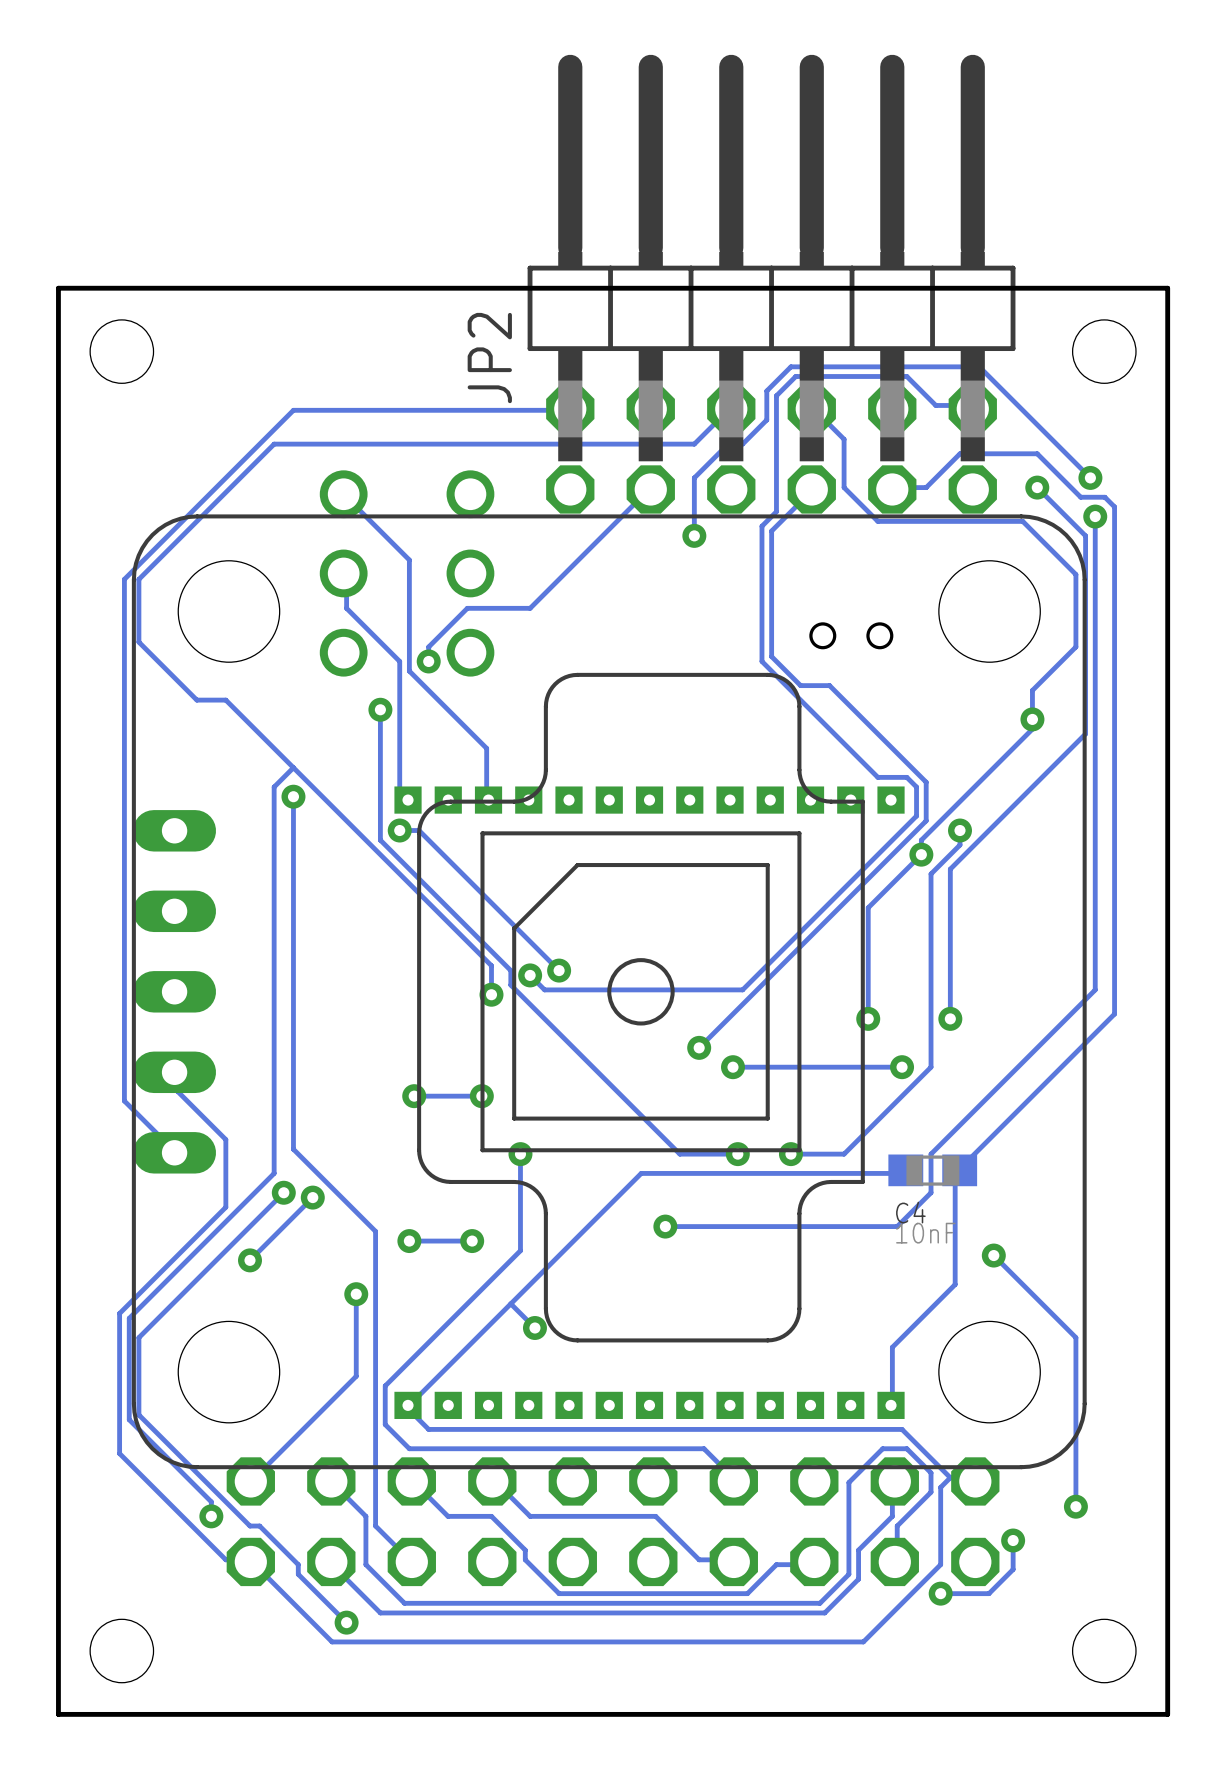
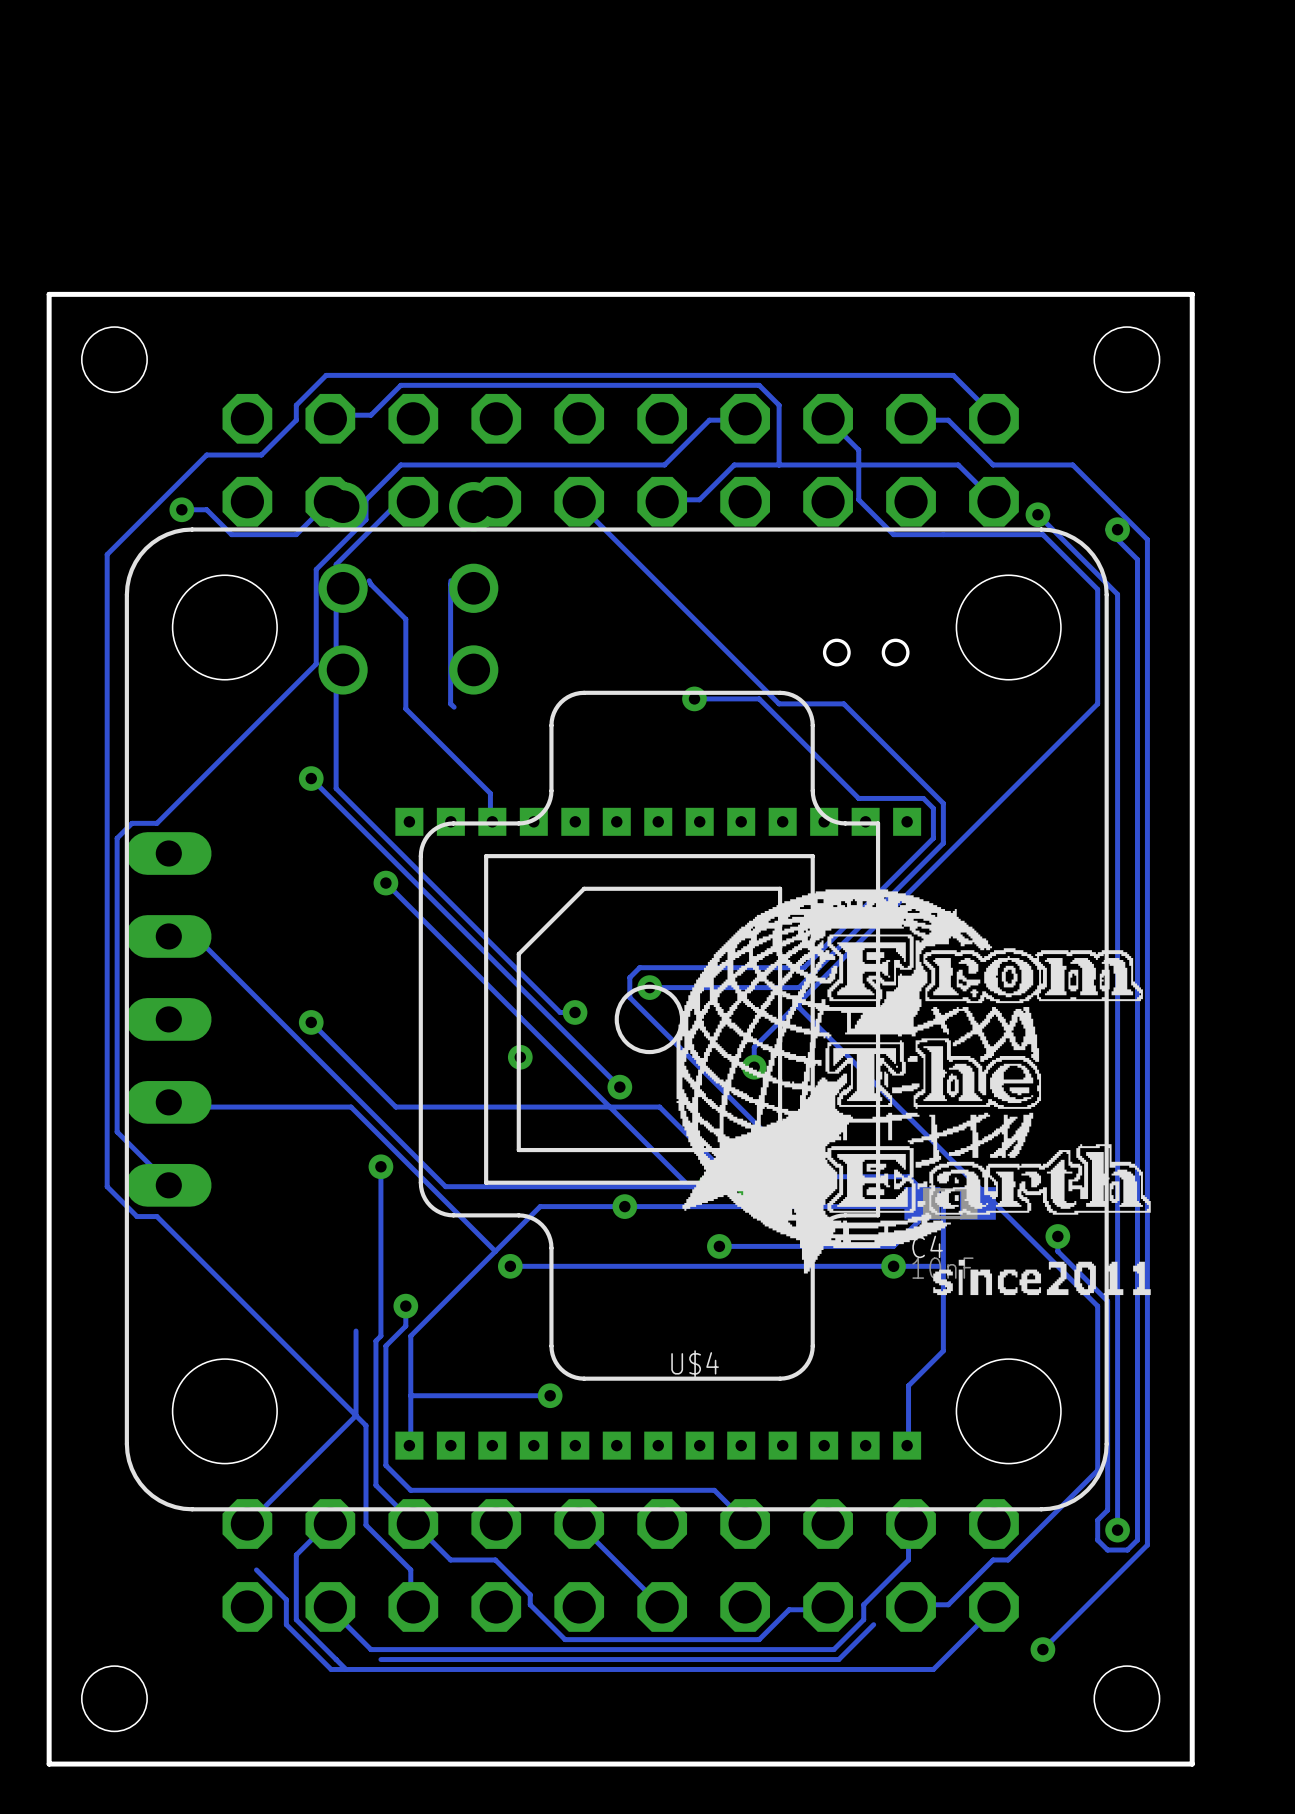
JP2: (771, 284) -> none
track: (790, 366) (766, 390) (766, 395) -> (330, 418) (331, 415) (370, 415) (400, 385) (759, 385) (779, 405)
track: none -> (804, 375) (326, 375) (296, 405) (296, 420) (261, 455) (206, 455) (107, 554) (107, 1186) (137, 1216) (156, 1216) (366, 1425) (366, 1525) (410, 1569) (410, 1604)
track: (935, 366) (979, 366) (1090, 477) -> (953, 375) (993, 415) (993, 418)
track: (570, 408) (293, 410) (124, 579) (124, 816) -> (745, 418) (709, 420) (664, 464) (400, 464) (366, 499) (366, 519) (316, 569) (316, 664) (156, 823) (132, 823) (117, 838)
track: (731, 408) (694, 444) (274, 444) (138, 579) (138, 642) (196, 700) (225, 700) (385, 859) -> none
track: (972, 408) (969, 405) (935, 405) (906, 376) (795, 376) (776, 395) (776, 511) (761, 526) (761, 661) (877, 777) -> (694, 698) (759, 698) (858, 798) (893, 798)
track: (766, 419) (742, 444) (728, 444) (694, 477) (694, 535) -> (779, 430) (779, 464)
part: none -> (620, 460)
track: (974, 453) (960, 453) (926, 487) (892, 487) (892, 489) -> (993, 464) (948, 420) (911, 418)
track: (1037, 453) (1080, 497) (1104, 497) (1114, 506) (1114, 545) -> (1107, 529) (1137, 559)
track: none -> (1057, 464) (1072, 464) (1147, 539) (1147, 1545) (1042, 1649)
via: (1090, 477) -> none
track: (1037, 487) (1085, 535) (1085, 733) (950, 869) (950, 1018) -> none
via position: (1037, 487) -> (1037, 514)
track: none -> (330, 501) (296, 534) (231, 534) (206, 509) (181, 509)
track: none -> (413, 501) (410, 504) (395, 504) (336, 564) (336, 788) (560, 1012) (575, 1012)
track: (650, 489) (530, 608) (467, 608) (428, 646) (428, 661) -> none
track: (811, 489) (771, 531) (771, 656) (800, 685) -> (579, 501) (580, 504) (779, 703) (813, 703)
track: none -> (993, 501) (958, 464) (734, 464) (699, 499) (664, 499) (662, 501)
track: (343, 494) (409, 560) (409, 671) (486, 748) (486, 772) -> (369, 580) (405, 619) (405, 708) (490, 793)
via: none -> (181, 509)
track: (1095, 516) (1095, 579) -> (1037, 514) (1117, 594)
via: (694, 535) -> none
track: none -> (450, 580) (450, 703) (454, 707)
track: (343, 573) (346, 574) (346, 608) (399, 661) (399, 791) (408, 800) -> none
track: (1075, 646) (1032, 690) (1032, 729) -> (1097, 664) (1097, 703) (1052, 748)
via: (428, 661) -> none
via: none -> (694, 698)
track: (380, 709) (380, 840) (510, 970) (510, 985) -> none
via: (380, 709) -> none
via: (1032, 719) -> none
track: none -> (311, 778) (535, 1002)
via: none -> (311, 778)
track: (293, 767) (274, 787) (274, 1173) (129, 1318) (129, 1419) (211, 1501) (211, 1516) -> none
track: (293, 796) (293, 1149) (375, 1231) (375, 1303) -> (380, 1166) (380, 1336) (375, 1340)
via: (293, 796) -> none
track: (399, 830) (419, 830) (559, 970) -> none
via position: (399, 830) -> (385, 883)
track: (960, 830) (960, 845) (931, 873) (931, 1067) (844, 1154) (790, 1154) -> none
via: (960, 830) -> none
track: (921, 840) (921, 854) (868, 907) (868, 1018) -> (938, 863) (754, 1047) (754, 1067)
via: (921, 854) -> none
track: none -> (168, 936) (196, 937) (445, 1186) (689, 1186)
track: (790, 941) (742, 989) (544, 989) -> (619, 1087) (550, 1017)
track: none -> (804, 967) (639, 967) (629, 977) (629, 997) (808, 1176) (908, 1176) (918, 1186) (918, 1221) (893, 1246) (719, 1246)
via: none -> (649, 987)
track: (786, 960) (699, 1047) -> (799, 987) (649, 987)
track: (491, 965) (491, 994) -> (495, 992) (515, 1012)
via position: (559, 970) -> (575, 1012)
via: (530, 975) -> none
track: (1095, 989) (931, 1154) (931, 1192) (897, 1226) (665, 1226) -> (1117, 1017) (1117, 1530)
via: none -> (311, 1022)
via: (491, 994) -> none
track: (1114, 1014) (955, 1173) (955, 1284) (926, 1313) -> (1137, 1042) (1137, 1540) (1127, 1550) (1107, 1550) (1097, 1540)
via: (868, 1018) -> none
via: (950, 1018) -> none
via: none -> (520, 1057)
via: none -> (754, 1067)
via: (699, 1047) -> none
via: none -> (619, 1087)
U$4: none -> (913, 1092)
via: (732, 1067) -> none
track: (902, 1067) (732, 1067) -> none
via: (902, 1067) -> none
track: (177, 1076) (177, 1091) (225, 1139) (225, 1207) (119, 1313) (119, 1453) (225, 1559) (250, 1559) (332, 1641) (863, 1641) (940, 1564) (940, 1487) (950, 1477) -> (171, 1107) (351, 1107) (495, 1251)
via: (414, 1096) -> none
track: (481, 1096) (414, 1096) -> none
via: (481, 1096) -> none
via: none -> (380, 1166)
track: (520, 1154) (520, 1250) (385, 1385) -> (405, 1306) (405, 1326) (385, 1345) (385, 1425)
via: (520, 1154) -> none
track: (728, 1154) (699, 1154) -> (739, 1186) (659, 1107) (395, 1107) (311, 1022)
via: (790, 1154) -> none
track: none -> (945, 1203) (943, 1206) (943, 1350)
via: none -> (624, 1206)
track: (641, 1173) (409, 1405) -> (649, 1206) (540, 1206) (410, 1336) (410, 1445)
track: (283, 1192) (138, 1337) (138, 1414) (250, 1526) (259, 1526) -> none
via: (283, 1192) -> none
track: (312, 1197) (250, 1260) -> none
via: (312, 1197) -> none
track: none -> (1057, 1236) (1057, 1251) (1107, 1301) (1107, 1510) (1097, 1520)
via: none -> (1057, 1236)
via: none -> (719, 1246)
via: (665, 1226) -> none
via: none -> (893, 1266)
track: none -> (943, 1266) (510, 1266)
via: (409, 1241) -> none
track: (472, 1241) (409, 1241) -> none
via position: (472, 1241) -> (510, 1266)
track: (993, 1255) (1075, 1337) -> (799, 1002) (799, 1007) (1097, 1306) (1097, 1375)
via: (993, 1255) -> none
via: (250, 1260) -> none
via: none -> (405, 1306)
via: (356, 1294) -> none
track: (510, 1303) (534, 1328) -> none
via position: (534, 1328) -> (550, 1395)
track: none -> (550, 1395) (410, 1395)
track: (408, 1405) (409, 1410) (428, 1429) (902, 1429) (950, 1477) -> none
track: (1075, 1429) (1075, 1477) -> (1097, 1470) (1008, 1559) (993, 1559) (948, 1604) (913, 1604)
track: (375, 1443) (375, 1526) (409, 1559) -> (375, 1485) (413, 1524)
track: (331, 1481) (365, 1516) (365, 1564) (404, 1603) -> none
track: (492, 1481) (496, 1482) (530, 1516) (655, 1516) (699, 1559) (732, 1559) (733, 1561) -> none
track: none -> (579, 1524) (662, 1606)
via position: (1075, 1506) -> (1117, 1530)
via: (211, 1516) -> none
track: (1013, 1540) (1013, 1569) (988, 1593) (940, 1593) -> none
via: (1013, 1540) -> none
track: (858, 1550) (858, 1579) -> (873, 1594) (863, 1604)
track: (288, 1555) (298, 1564) -> (330, 1524) (326, 1525) (296, 1555) (296, 1609)
track: none -> (286, 1599) (286, 1624) (331, 1669) (933, 1669) (993, 1606)
track: (897, 1559) (897, 1526) (931, 1492) (931, 1472) (906, 1448) (882, 1448) (848, 1482) (848, 1559) -> none
via: (940, 1593) -> none
track: (370, 1603) (380, 1612) -> (370, 1649) (405, 1649)
via: none -> (1042, 1649)
via: (346, 1622) -> none

